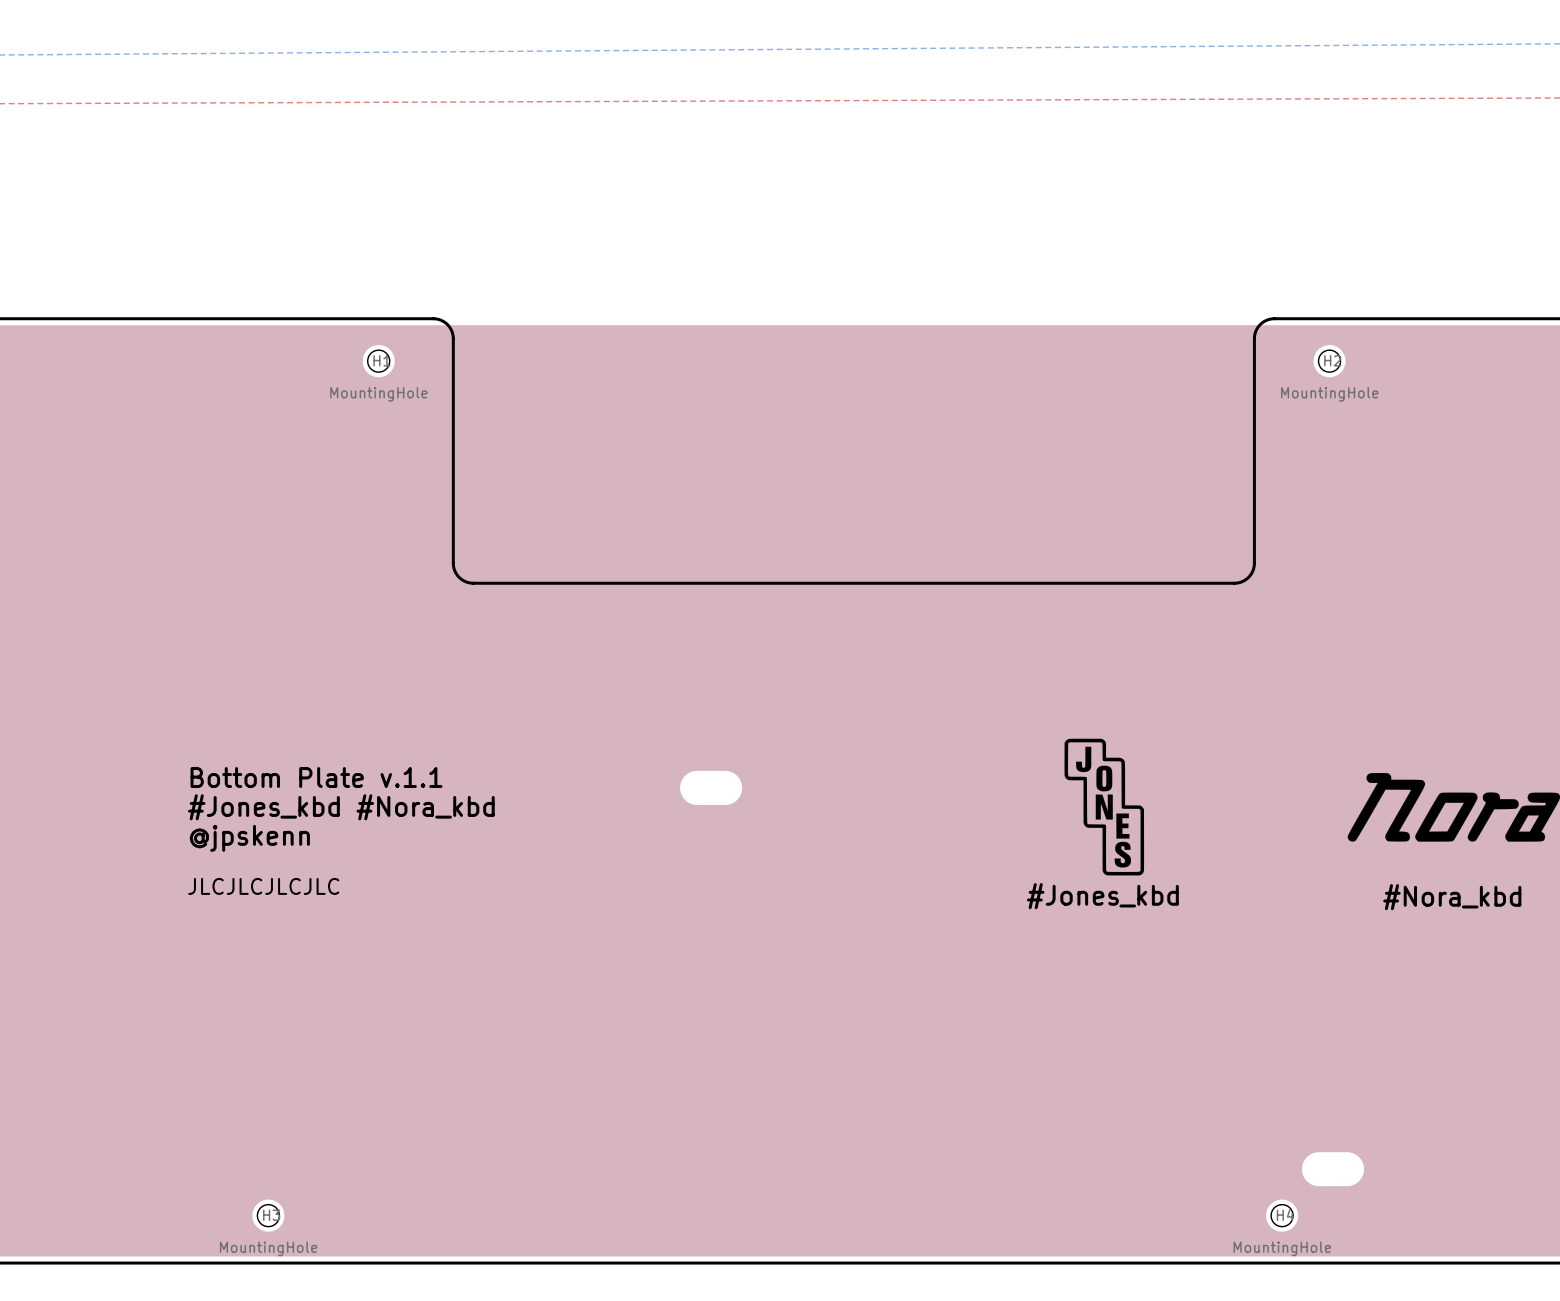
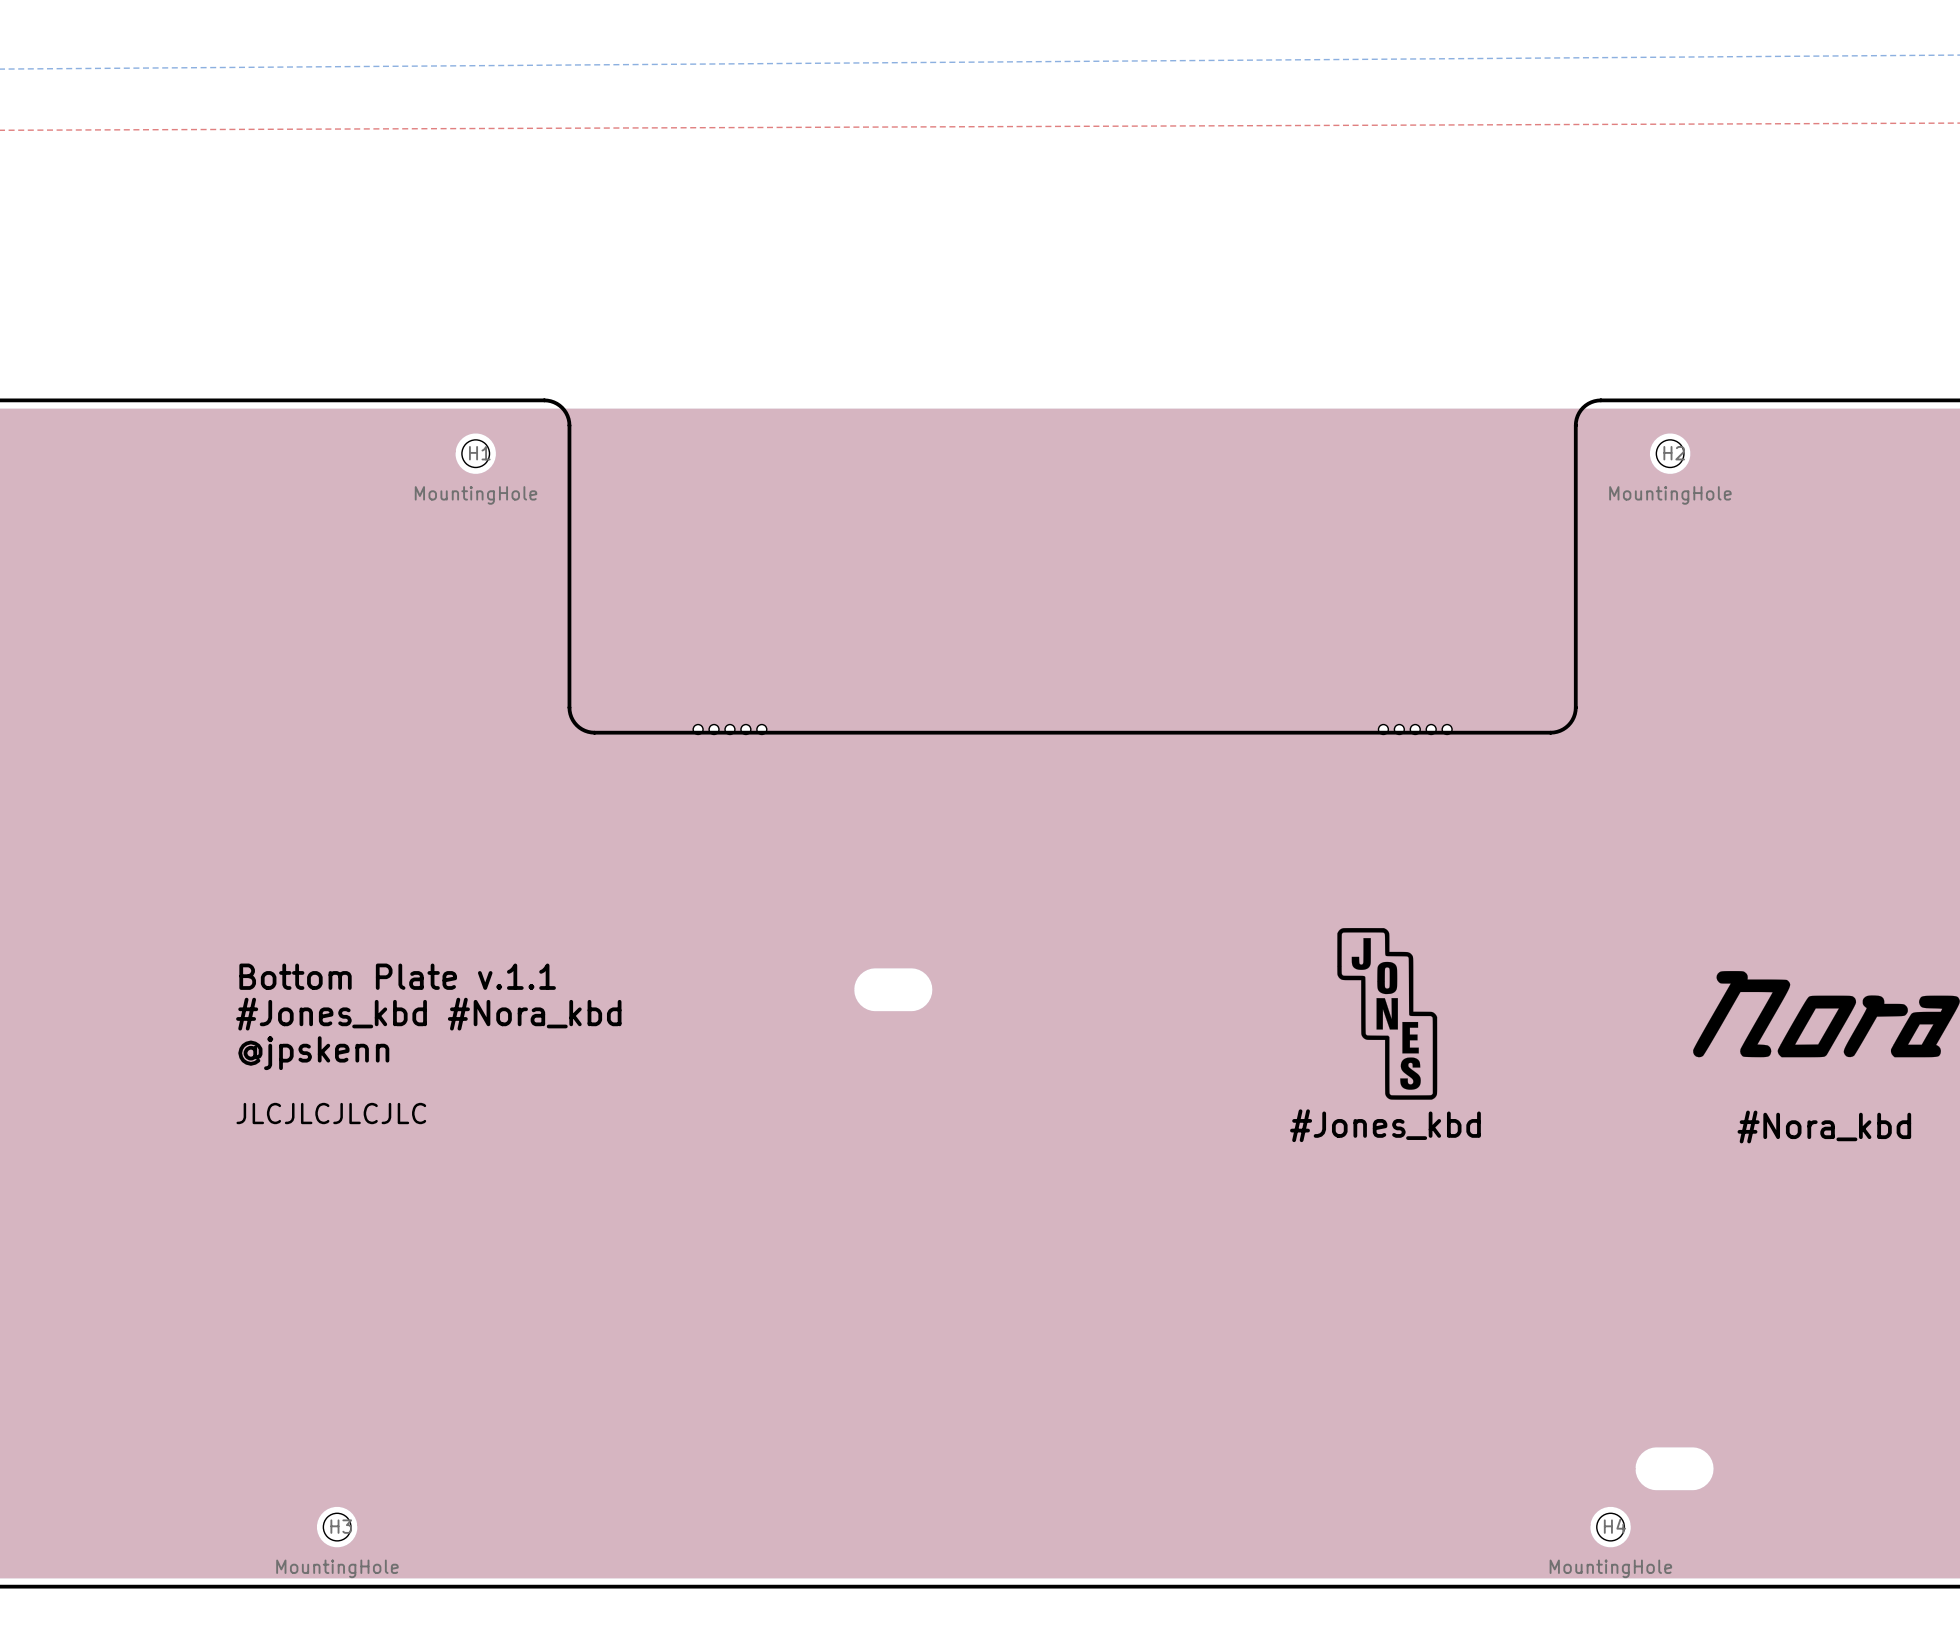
part: none -> (729, 729)
part: none -> (1415, 729)

